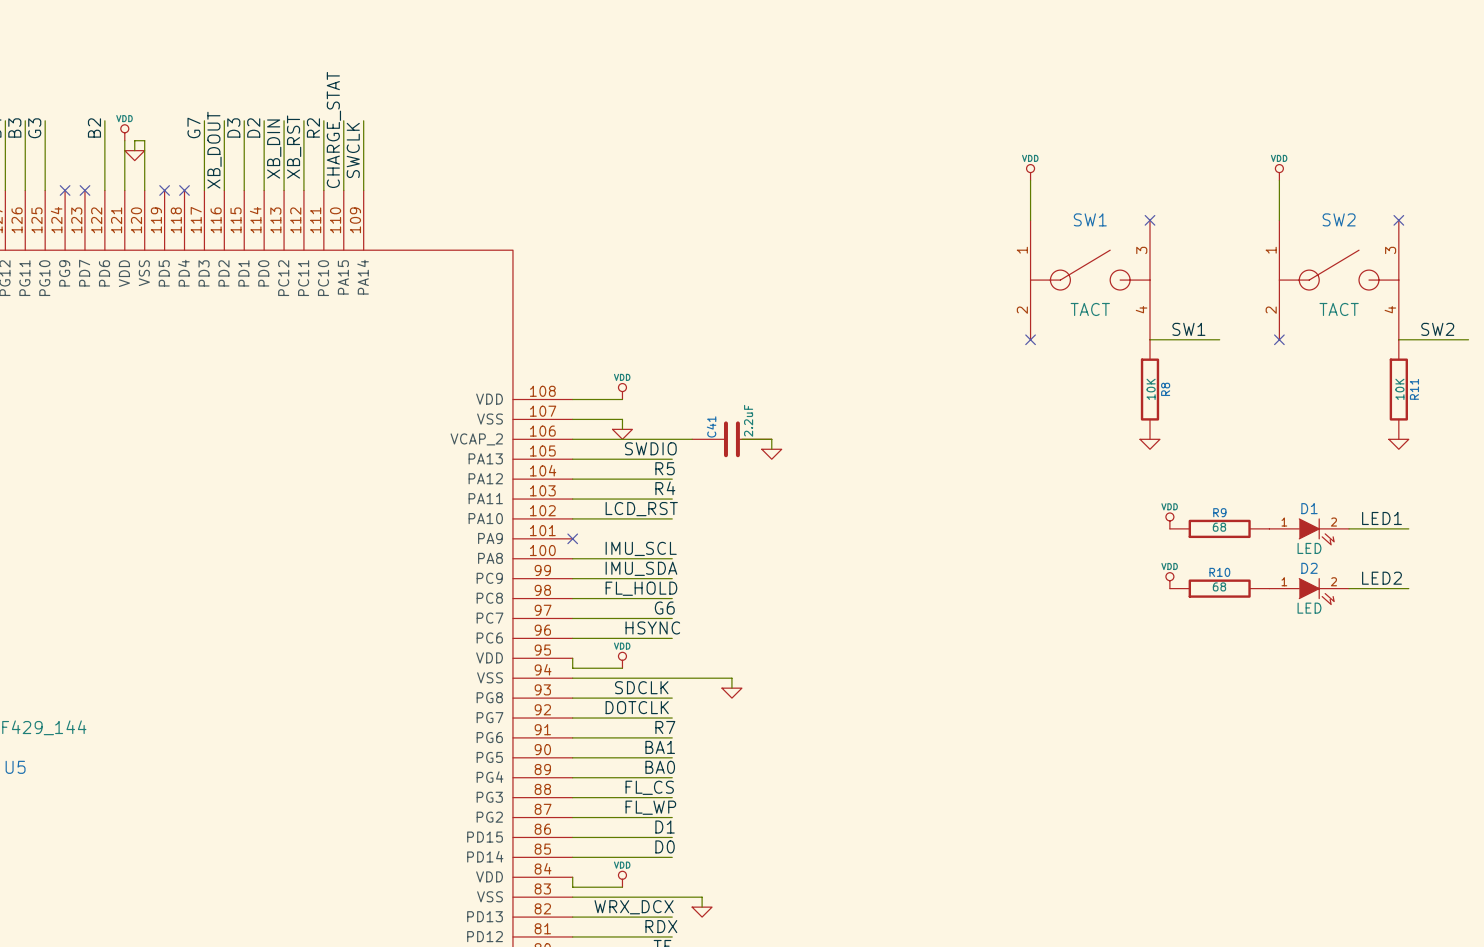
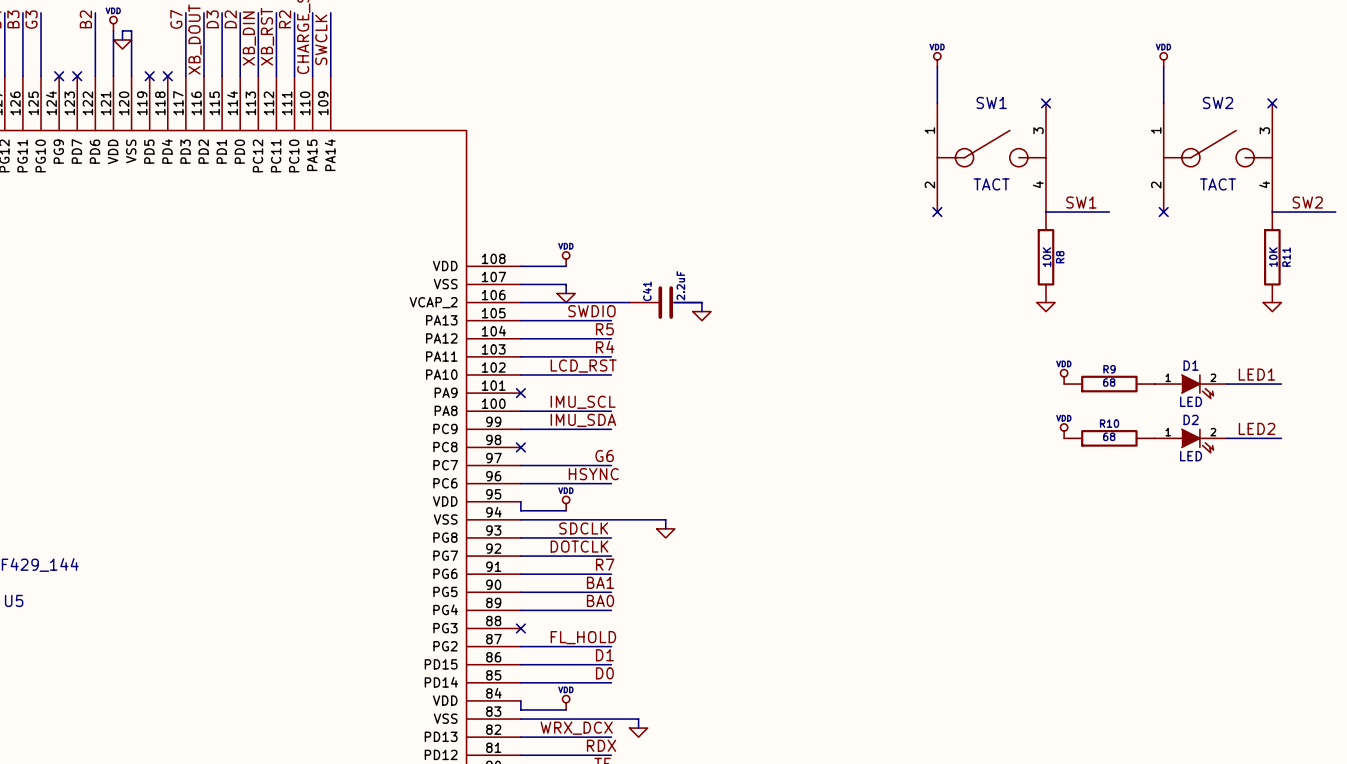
label: FL_HOLD (641, 588) -> none
wire: (572, 598) (672, 598) -> none
no-connect mark: none -> (520, 447)
label: FL_CS (649, 787) -> none
wire: (572, 797) (672, 797) -> none
no-connect mark: none -> (520, 628)
label: none -> FL_HOLD (583, 637)
label: FL_WP (650, 807) -> none

